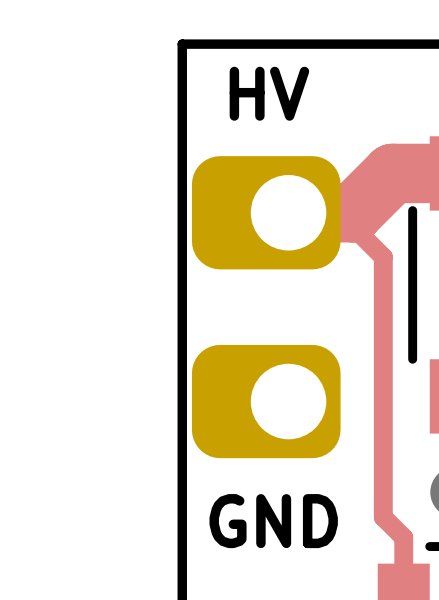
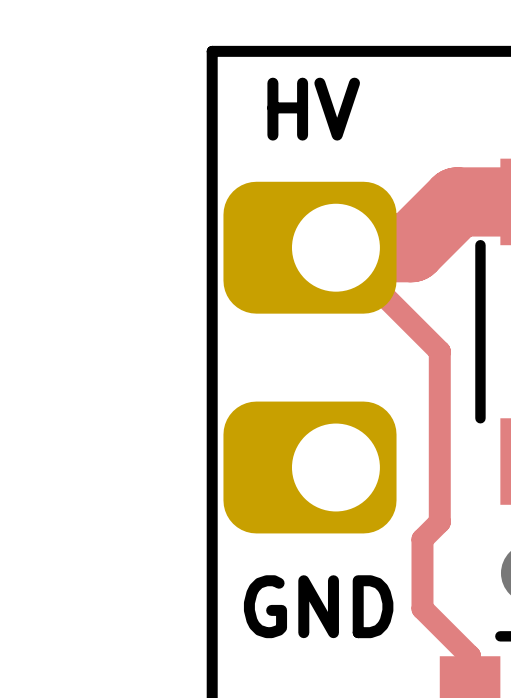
top track: (288, 212) (339, 212) (383, 257) (383, 517) (403, 537) (403, 563) -> (335, 247) (439, 351) (439, 522) (422, 539) (422, 608) (470, 656)

